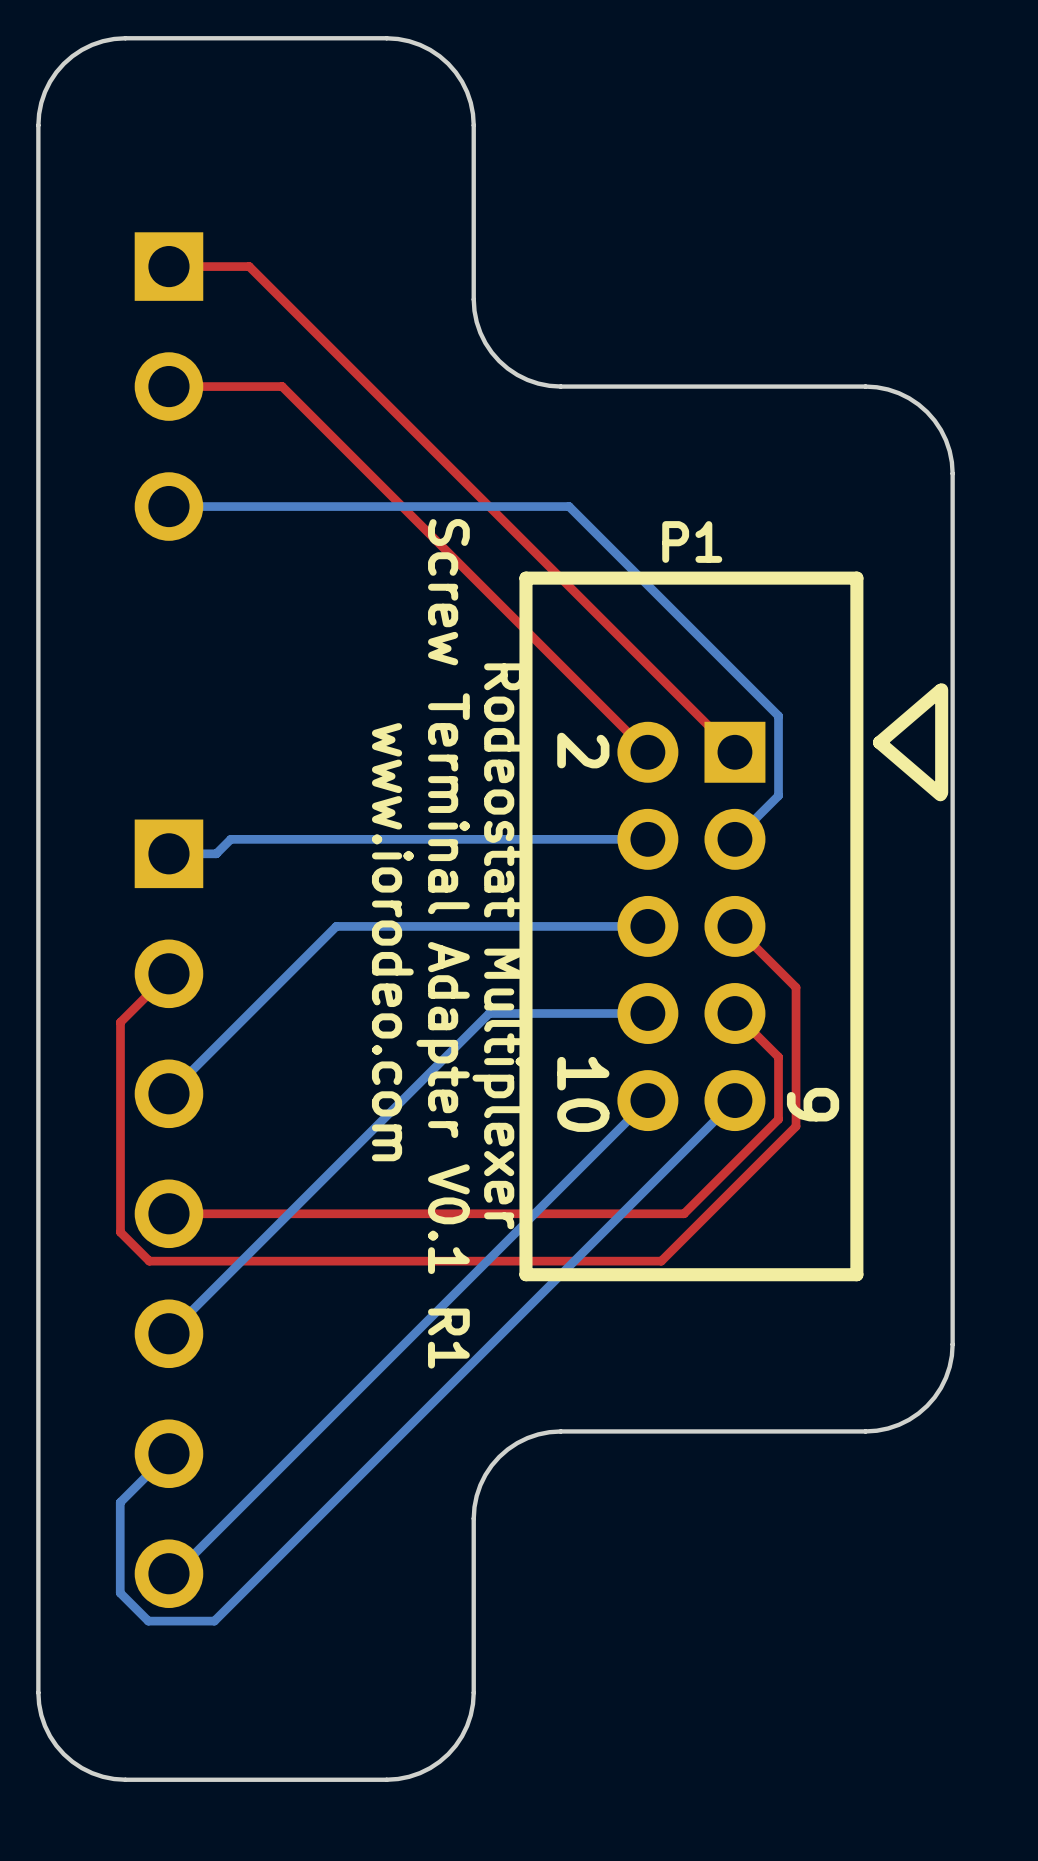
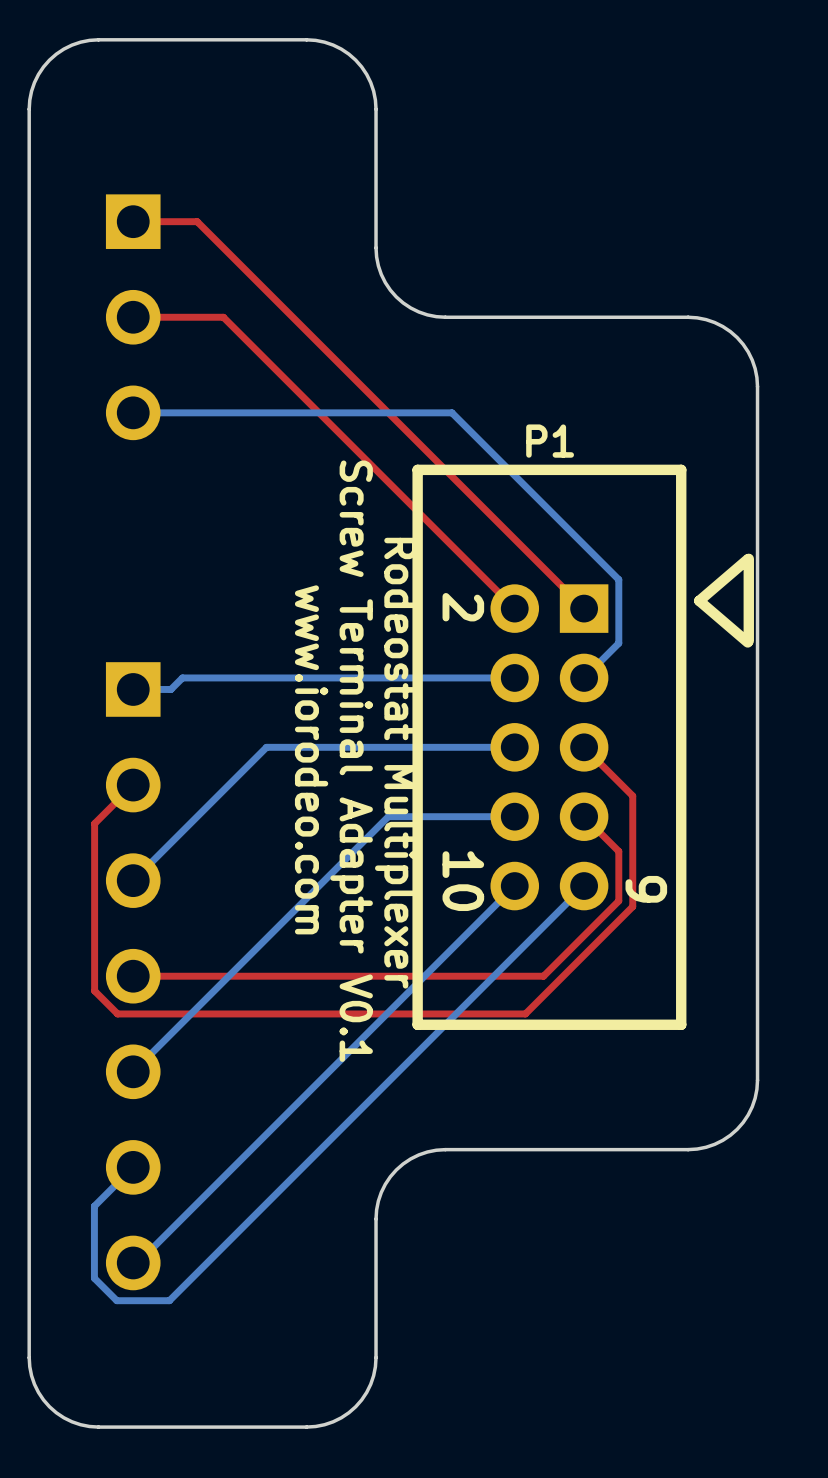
text: Screw Terminal Adapter V0.1 R1 (443, 943) -> Screw Terminal Adapter V0.1 (351, 761)

